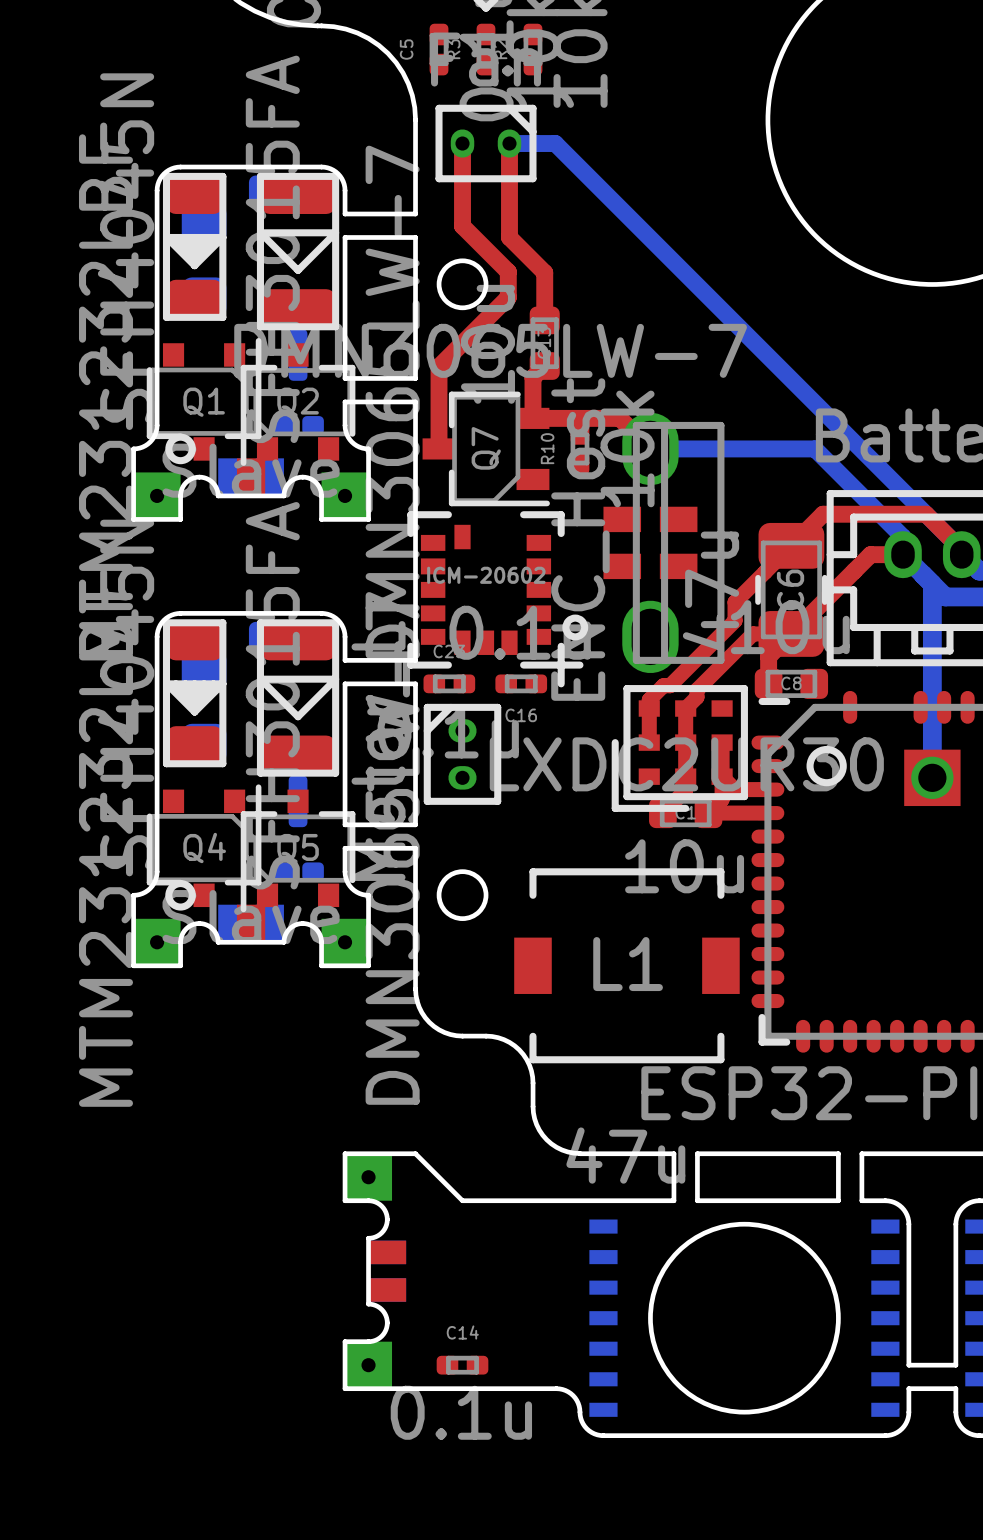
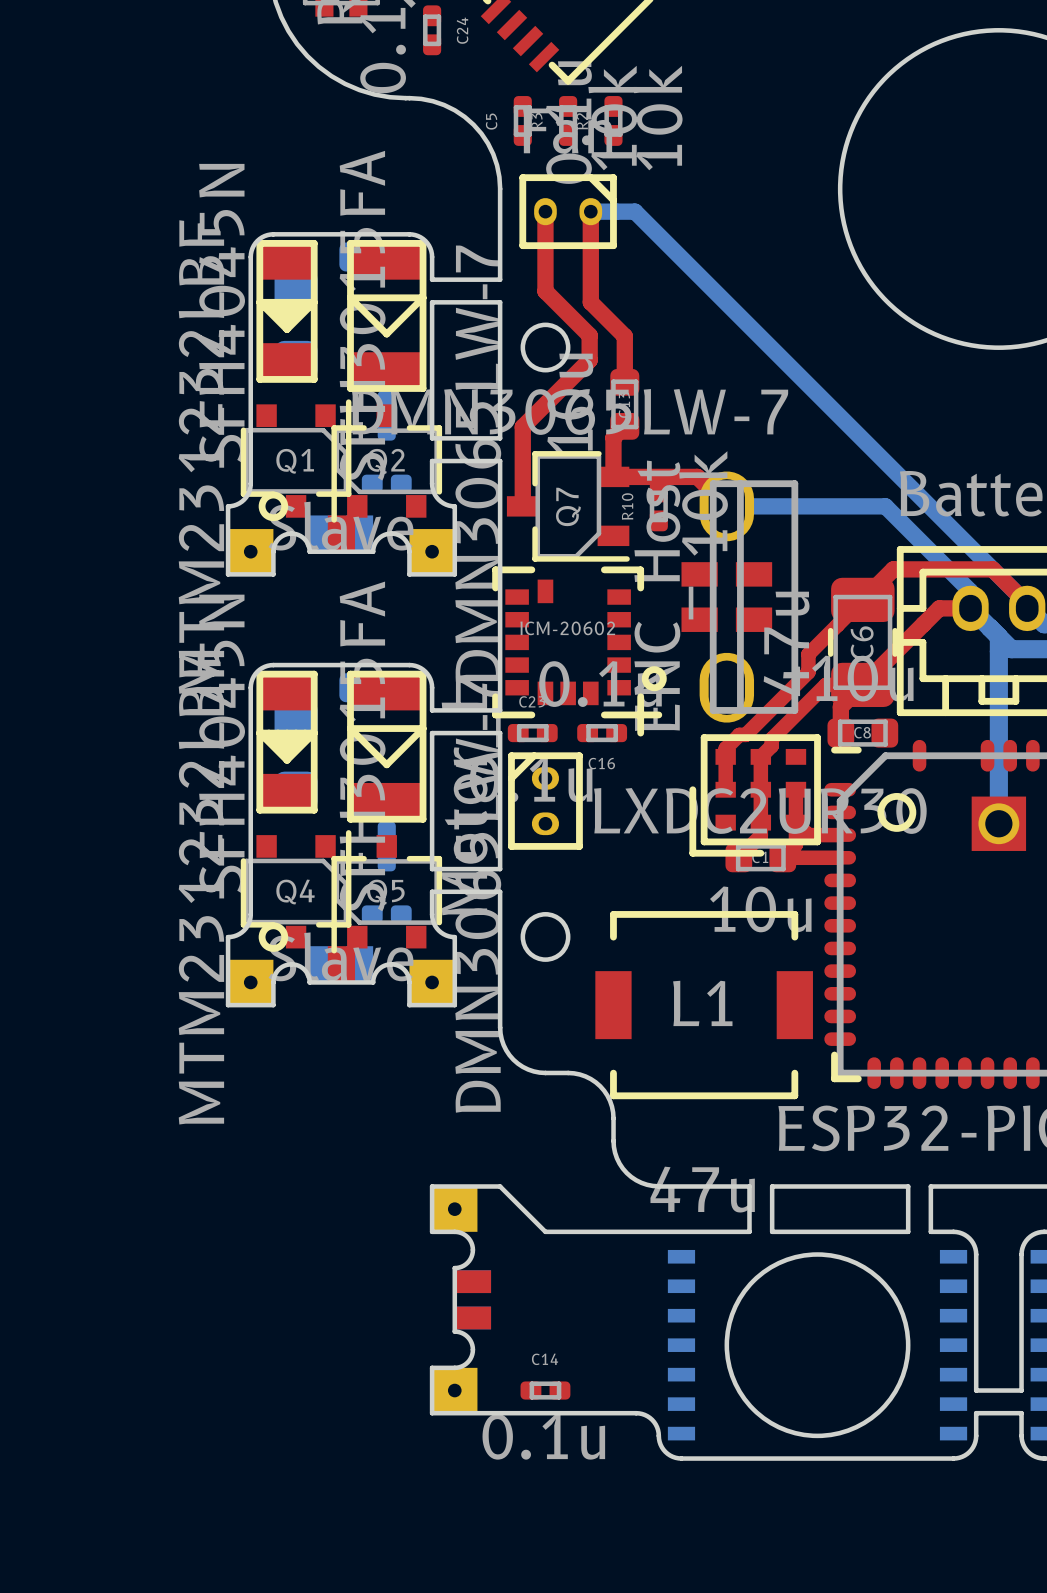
part footprint: [162, 172, 227, 321] -> [256, 239, 318, 383]
part footprint: [256, 172, 340, 331] -> [347, 239, 427, 392]
part footprint: [162, 619, 227, 768] -> [256, 670, 318, 814]
part footprint: [256, 619, 340, 777] -> [347, 670, 427, 823]
L1 footprint: [514, 868, 740, 1064] -> [595, 911, 813, 1100]

